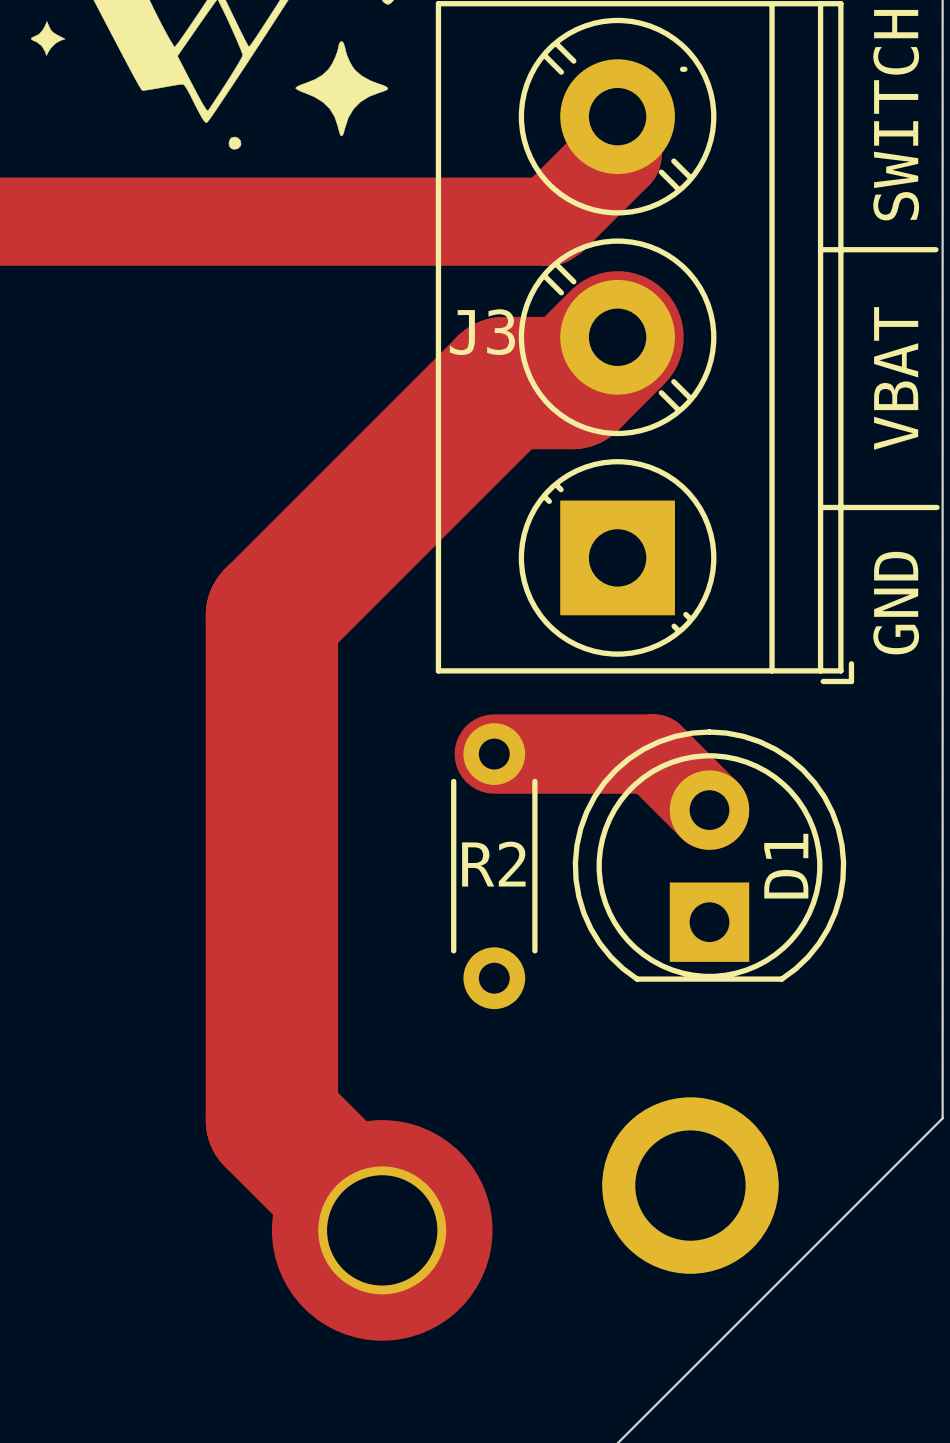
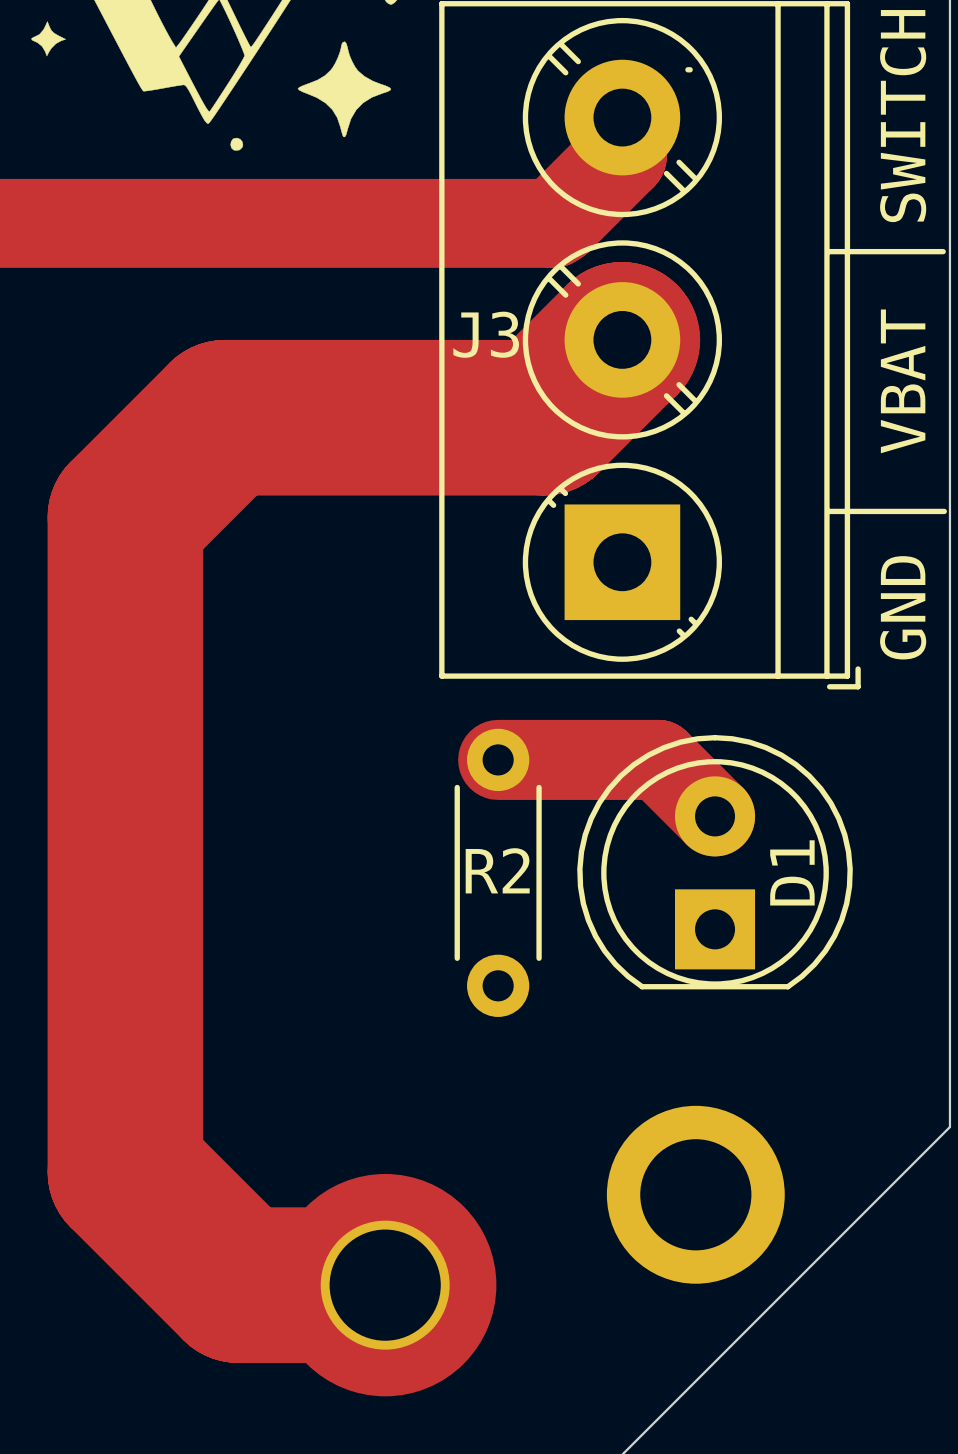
track: (617, 337) (571, 383) (504, 383) (271, 615) (271, 1120) (382, 1230) -> (621, 339) (543, 417) (224, 417) (125, 517) (125, 1172) (238, 1285) (385, 1285)
part position: (382, 1230) -> (385, 1285)

